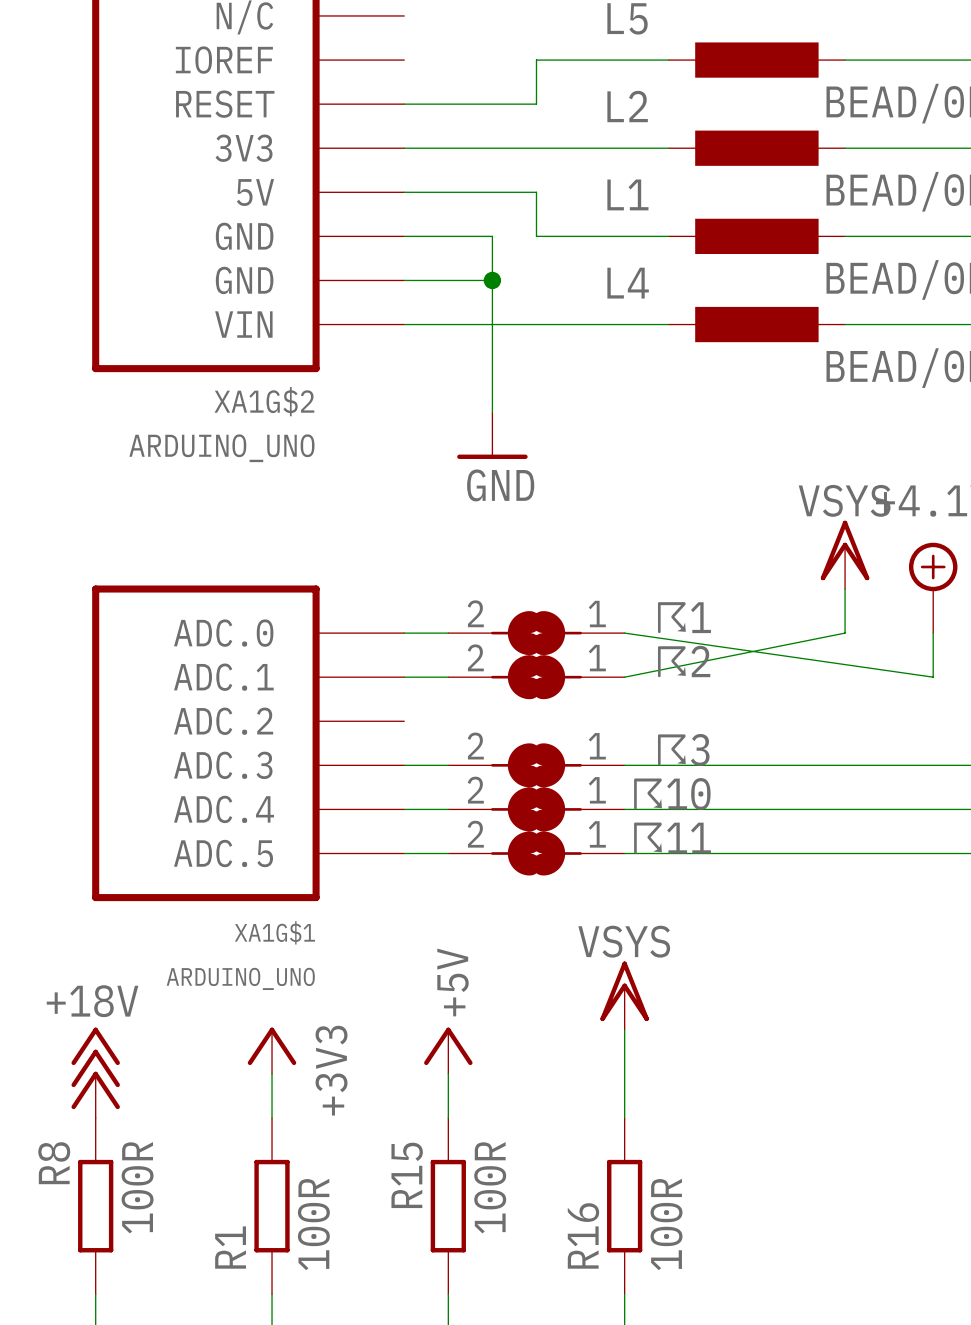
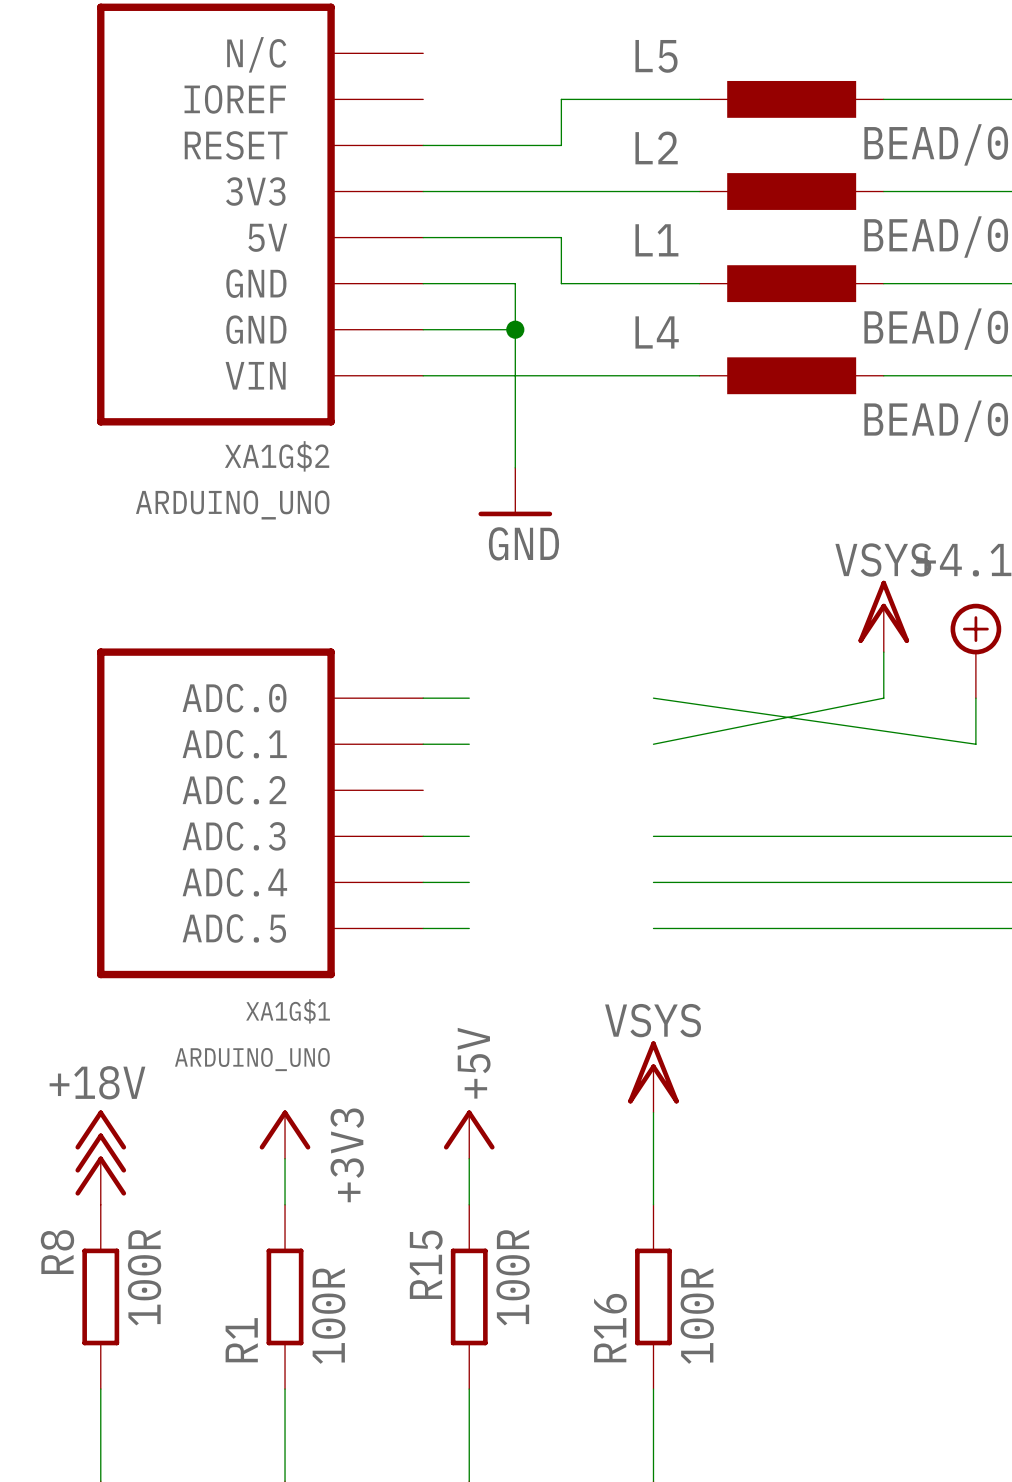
☈1: (536, 633) -> none
☈2: (536, 677) -> none
☈3: (536, 765) -> none
☈10: (536, 809) -> none
☈11: (536, 853) -> none

